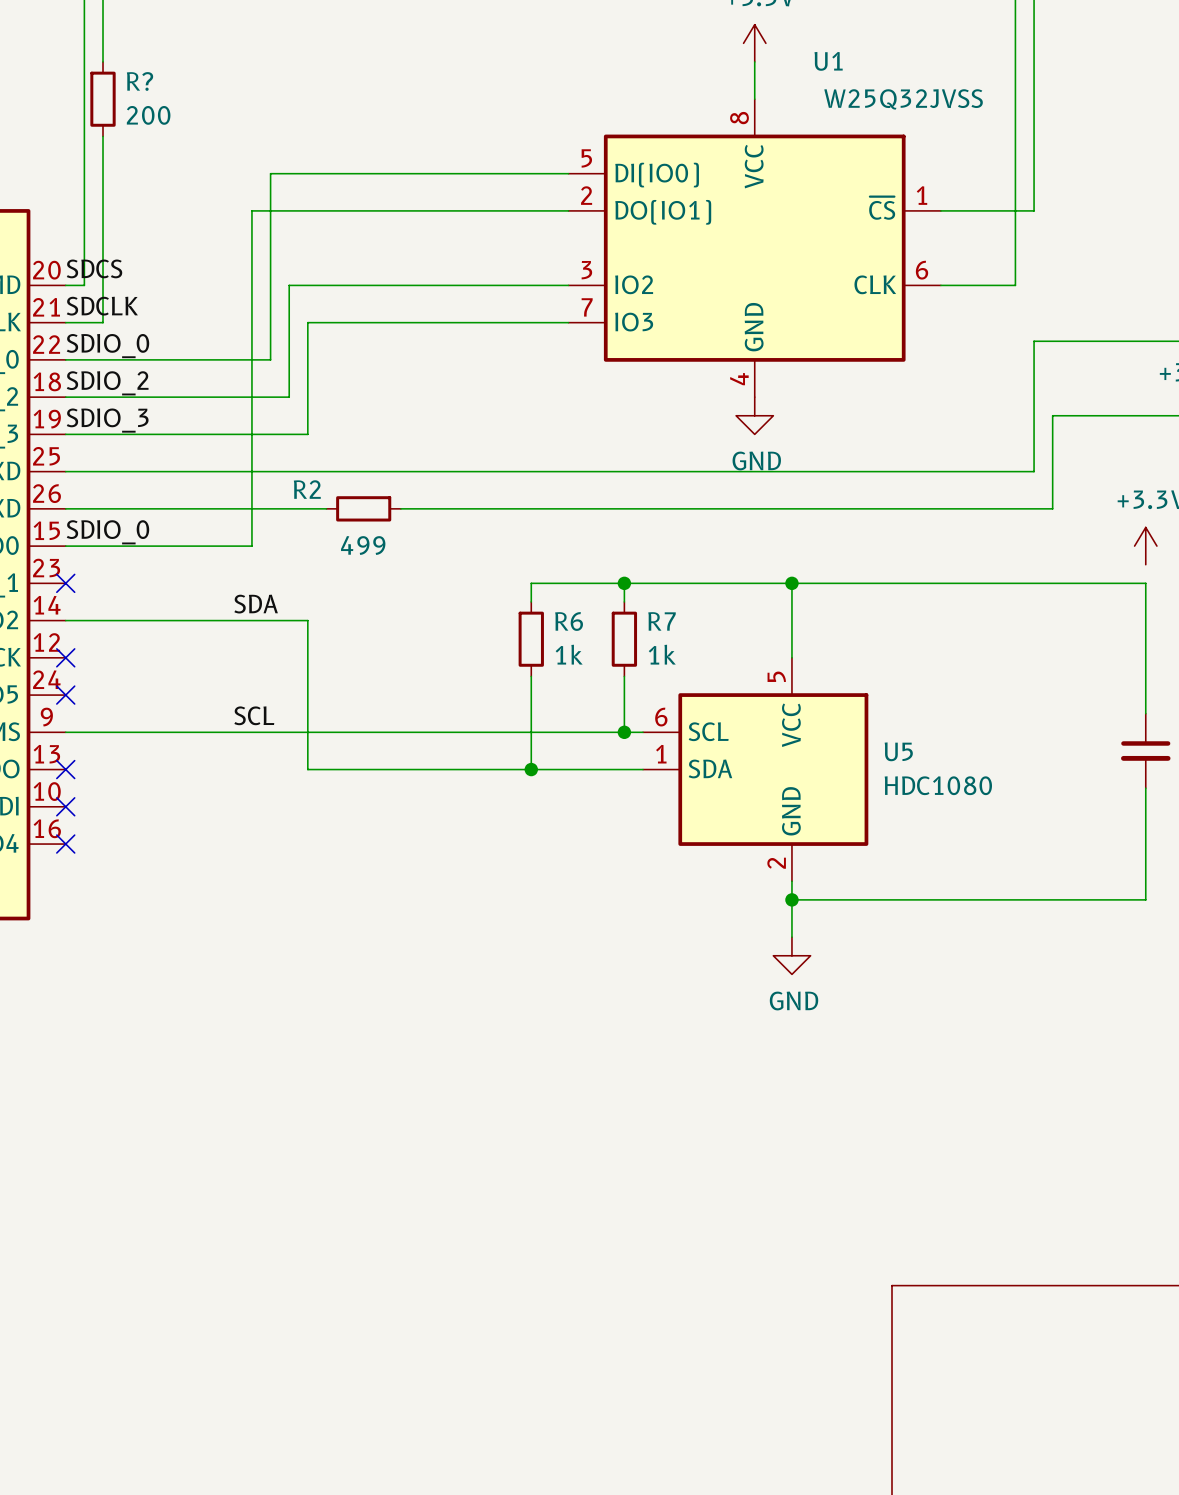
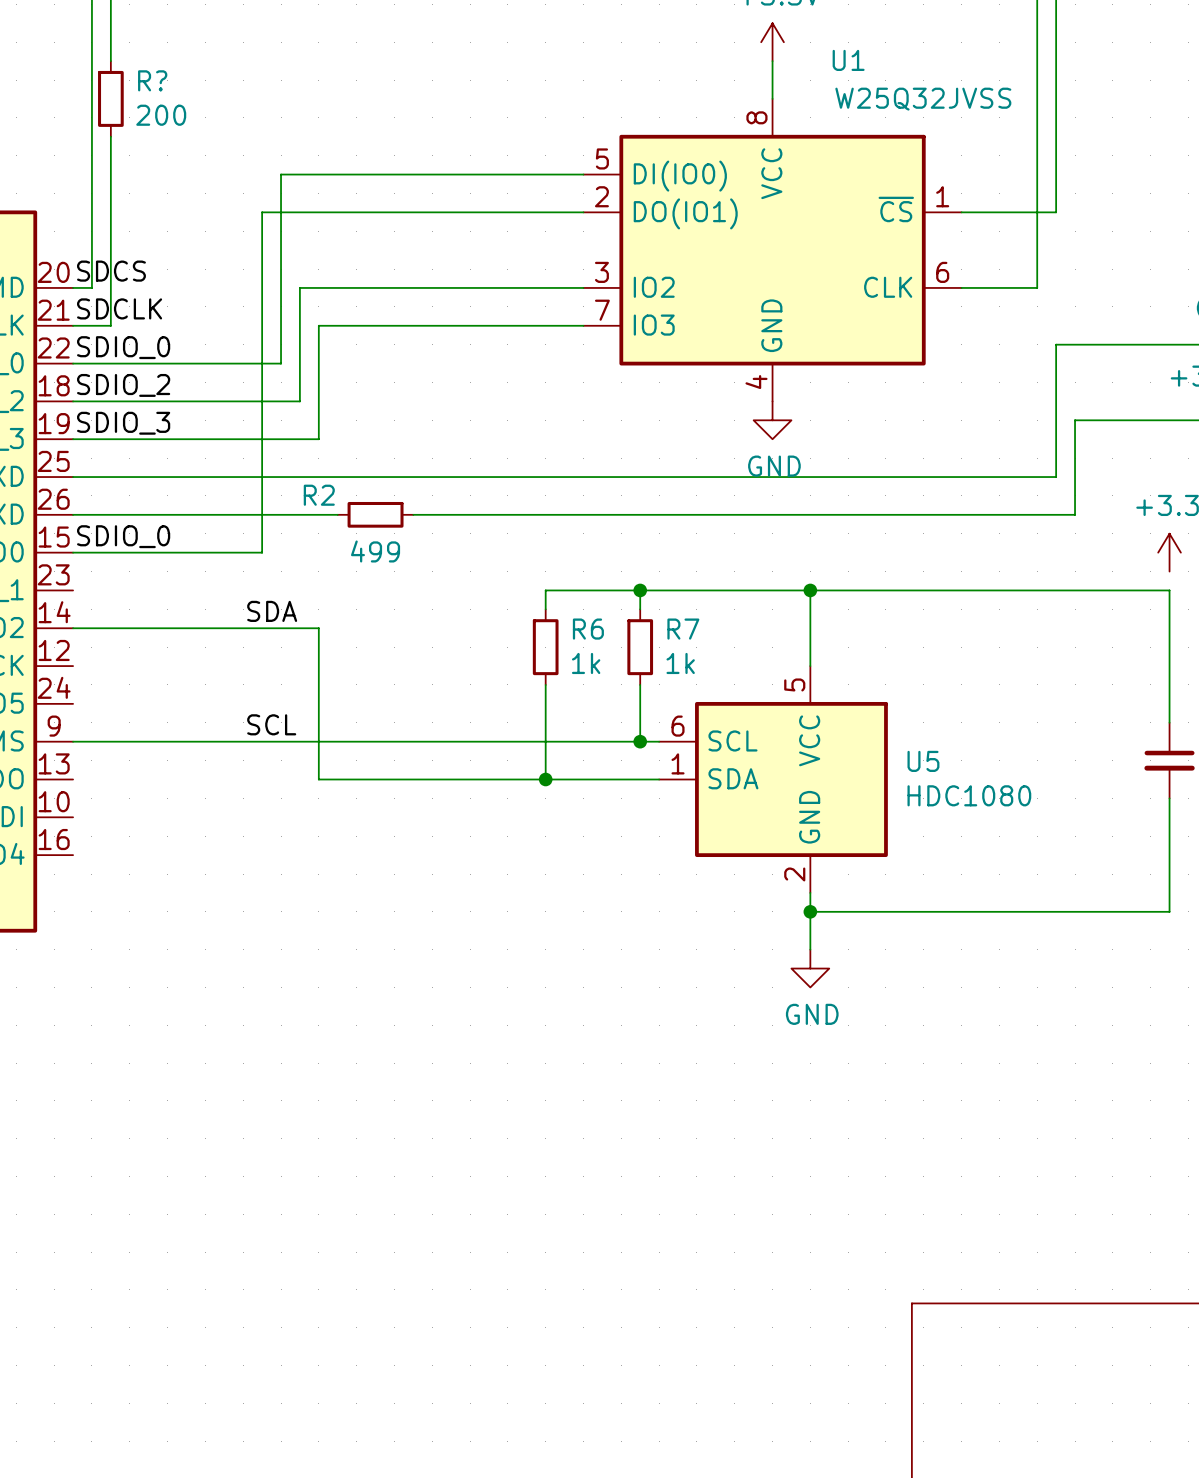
no-connect mark: (65, 583) -> none
no-connect mark: (65, 657) -> none
no-connect mark: (65, 695) -> none
no-connect mark: (65, 769) -> none
no-connect mark: (65, 806) -> none
no-connect mark: (65, 844) -> none

